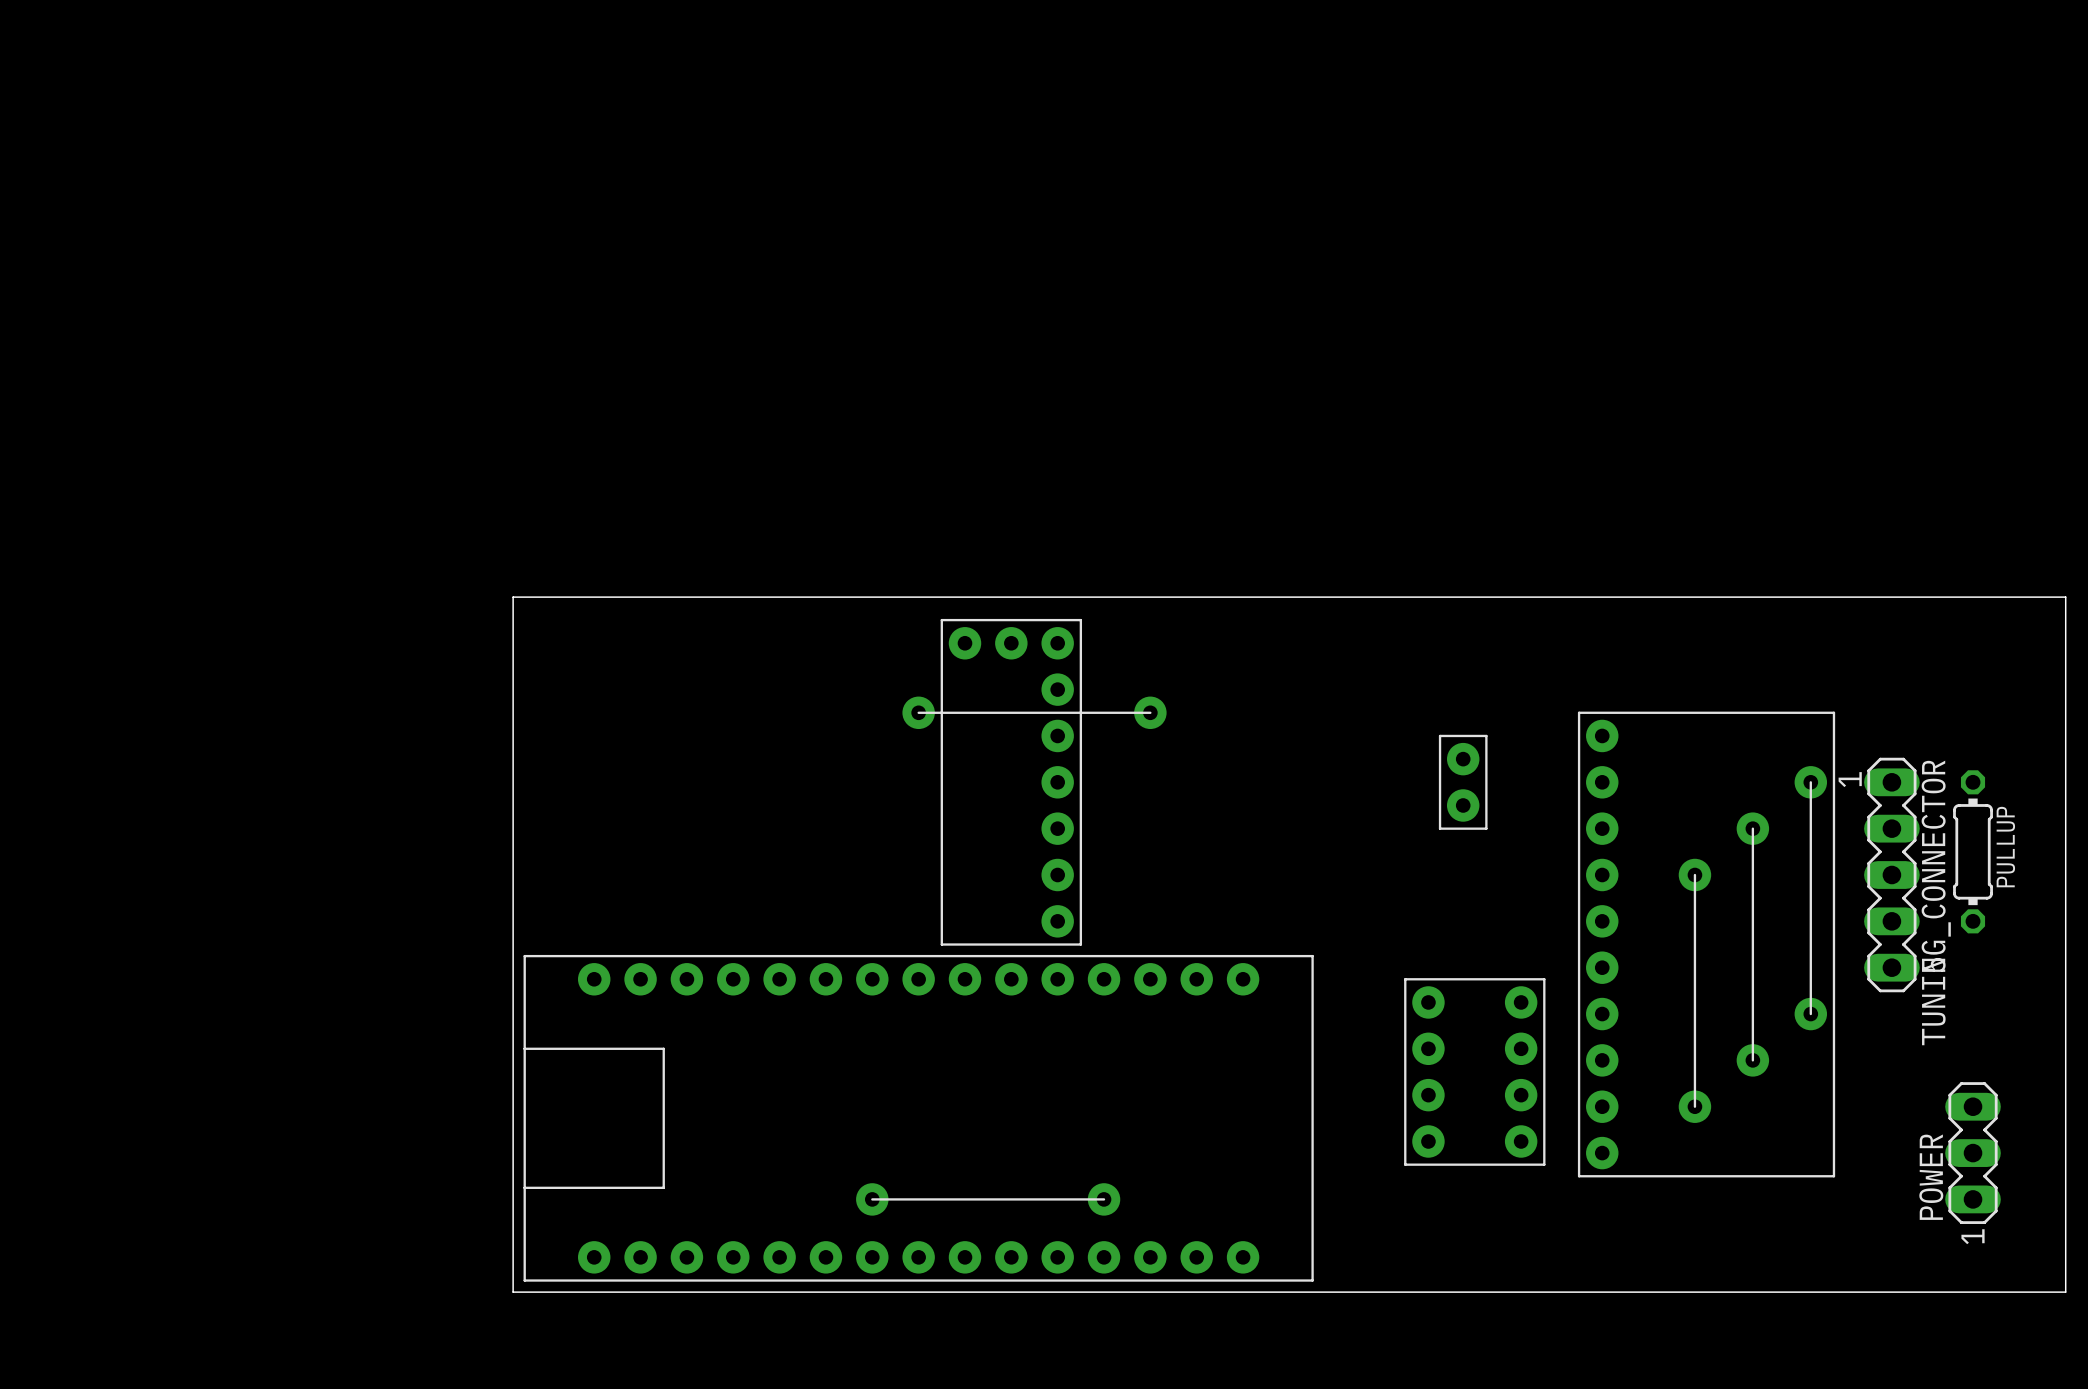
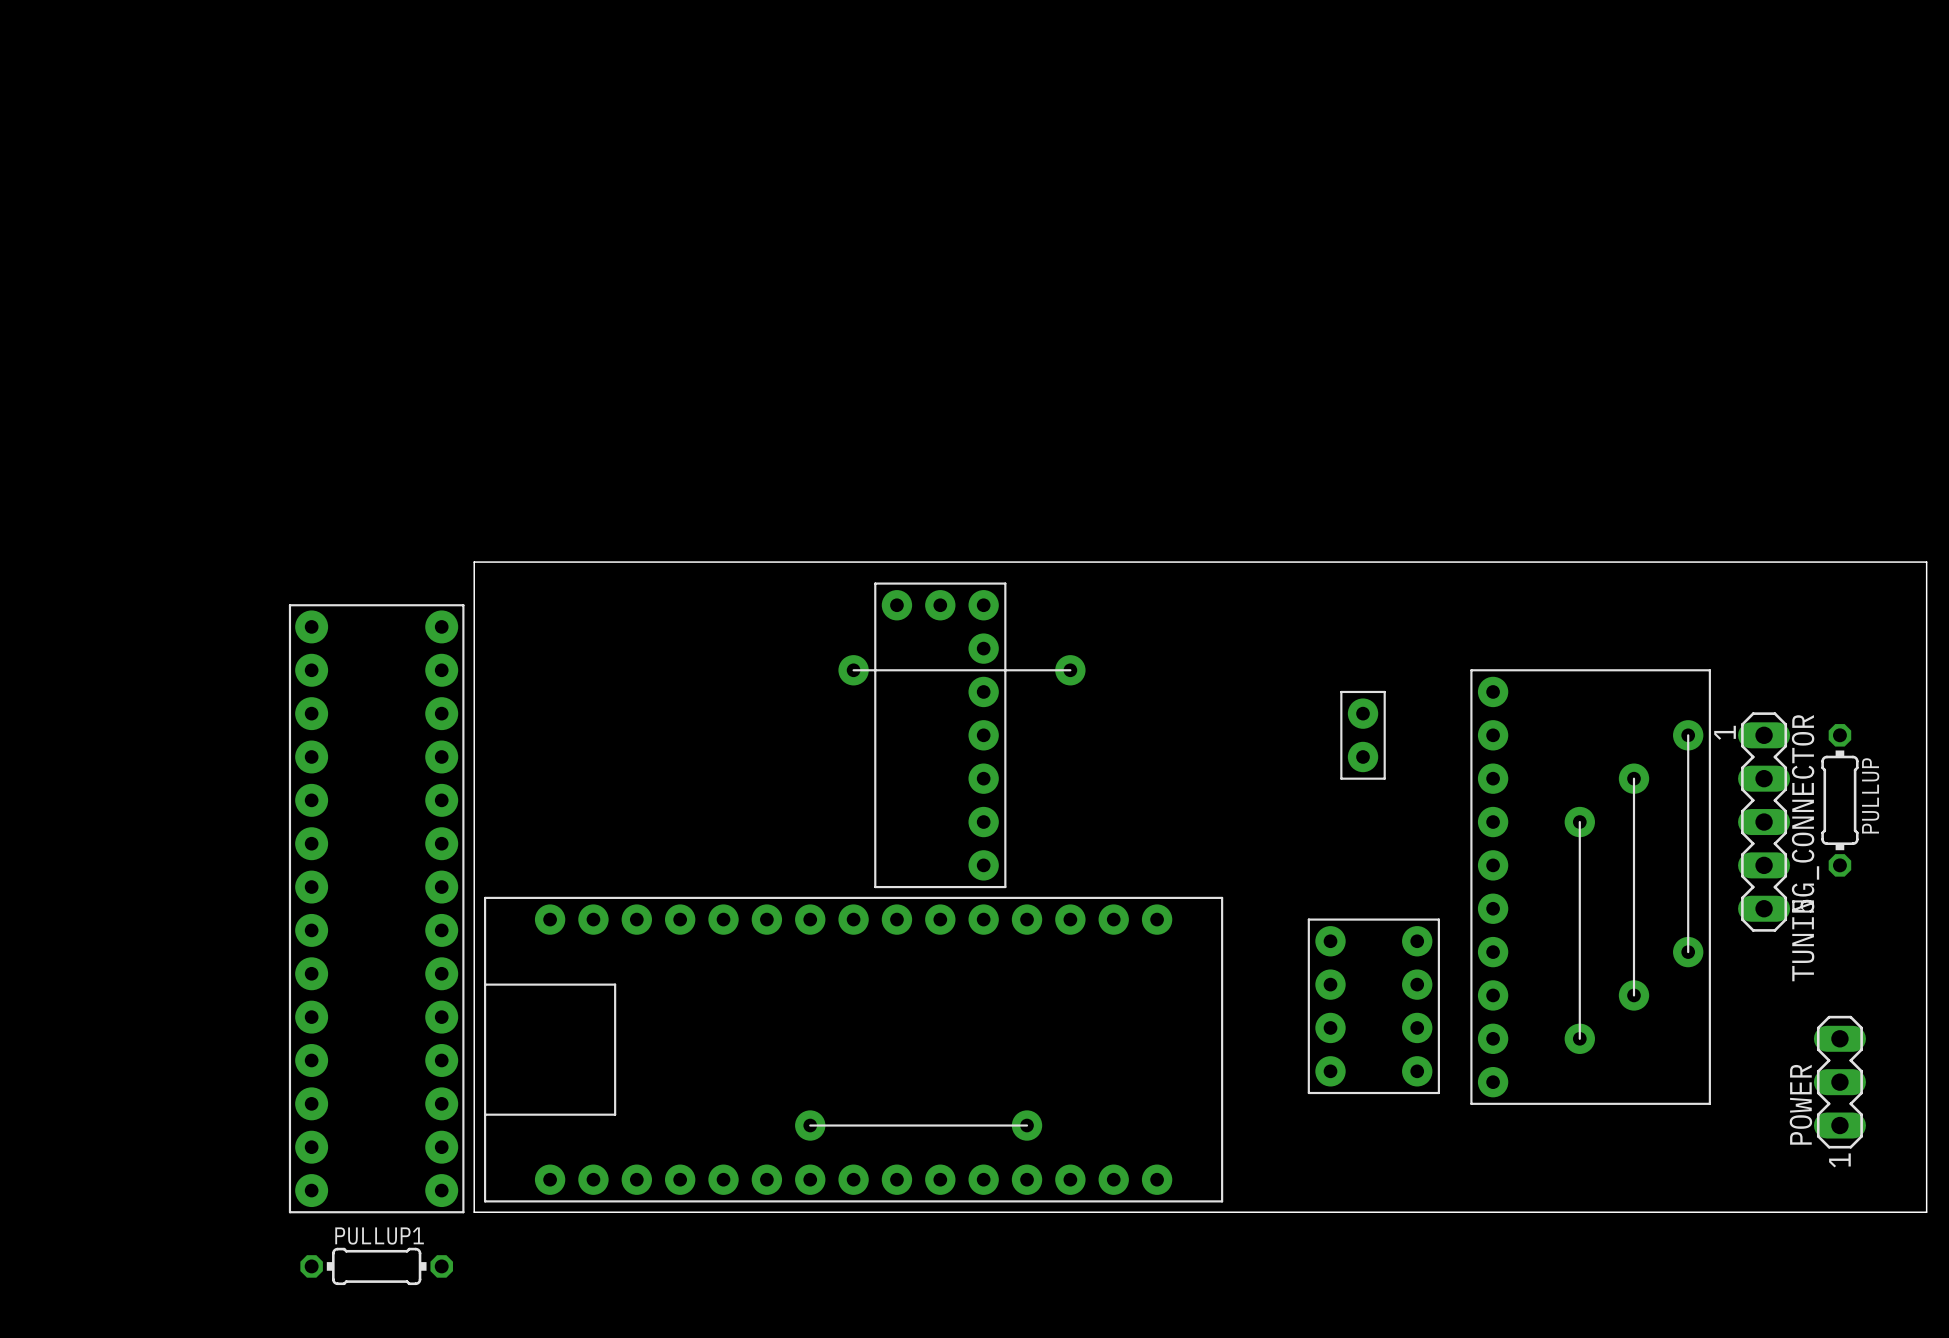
part: none -> (376, 908)
PULLUP1: none -> (376, 1266)

